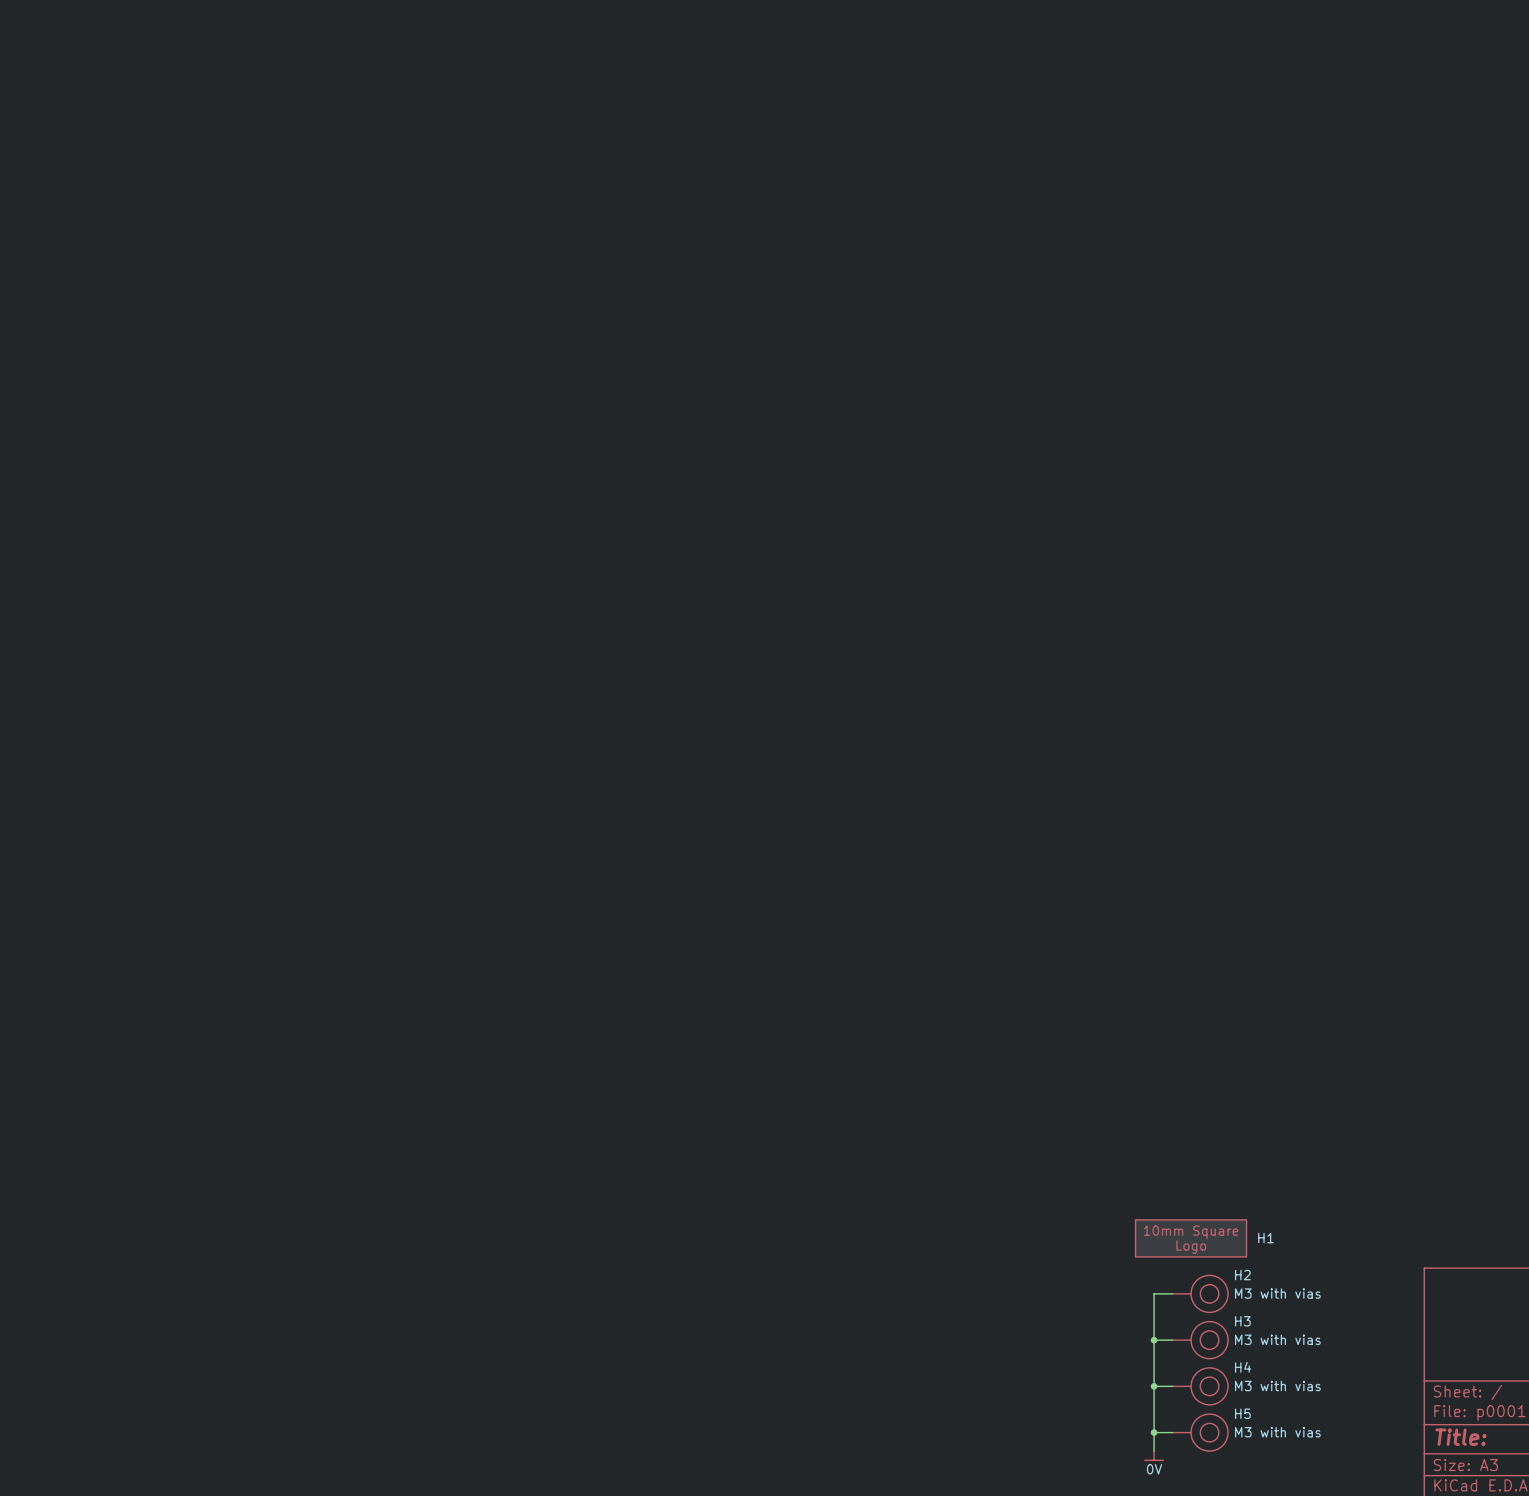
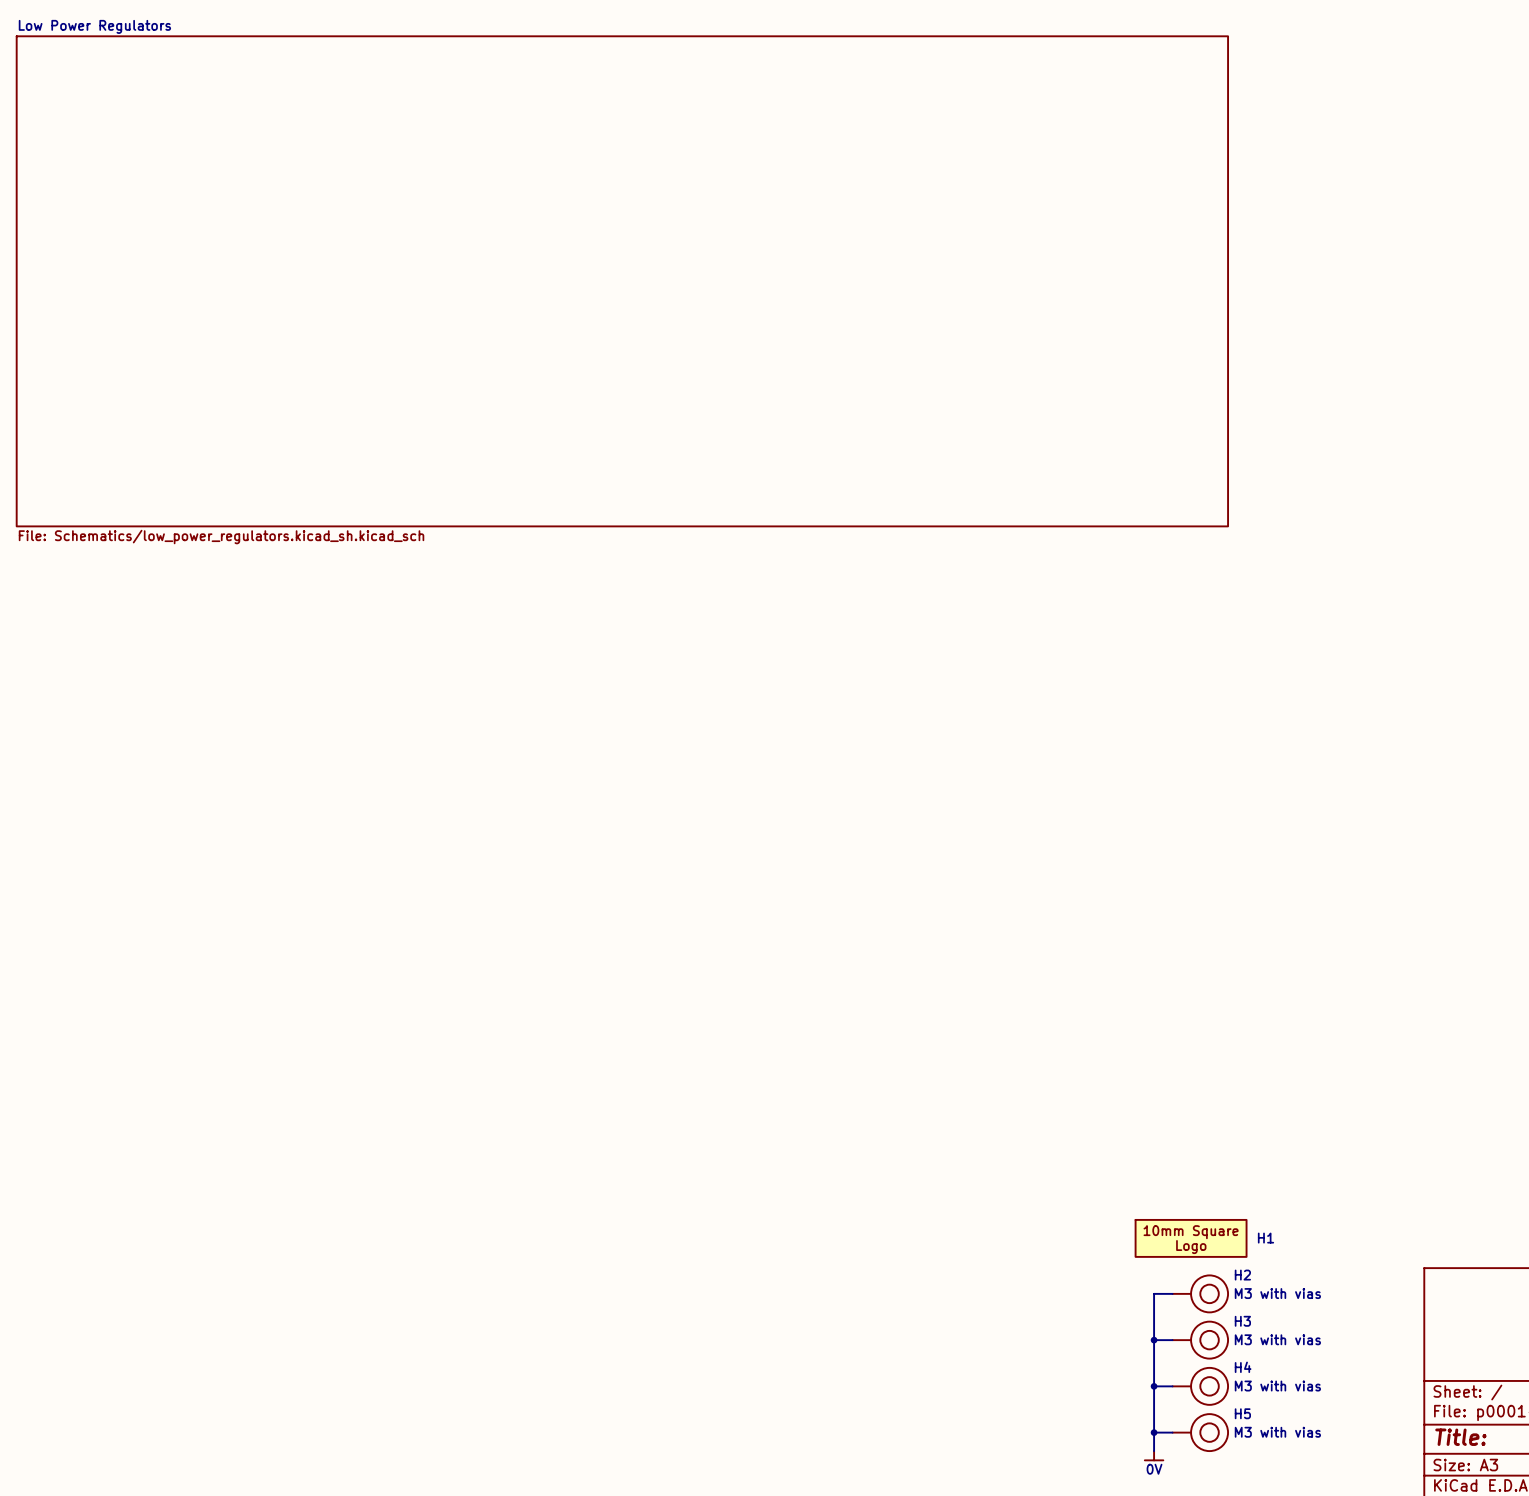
sheet Low Power Regulators: none -> File: Schematics/low_power_regulators.kicad_sh.kicad_sch (622, 281)

